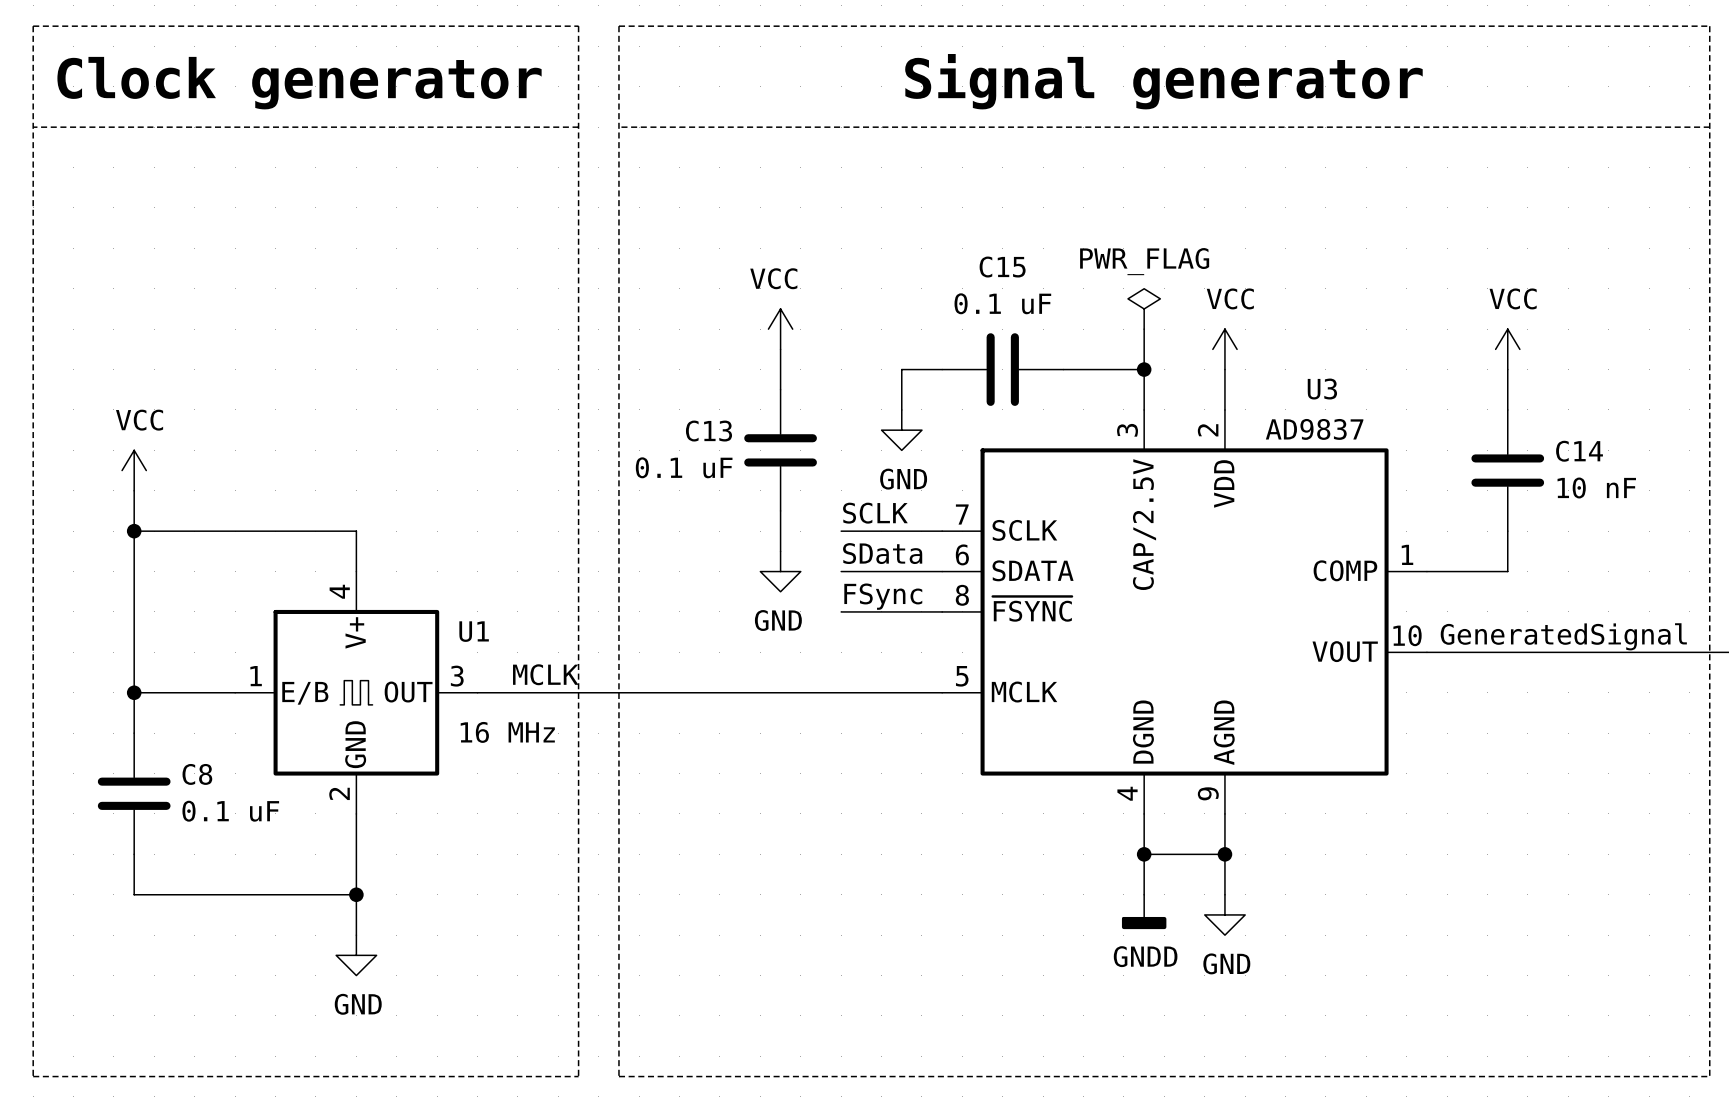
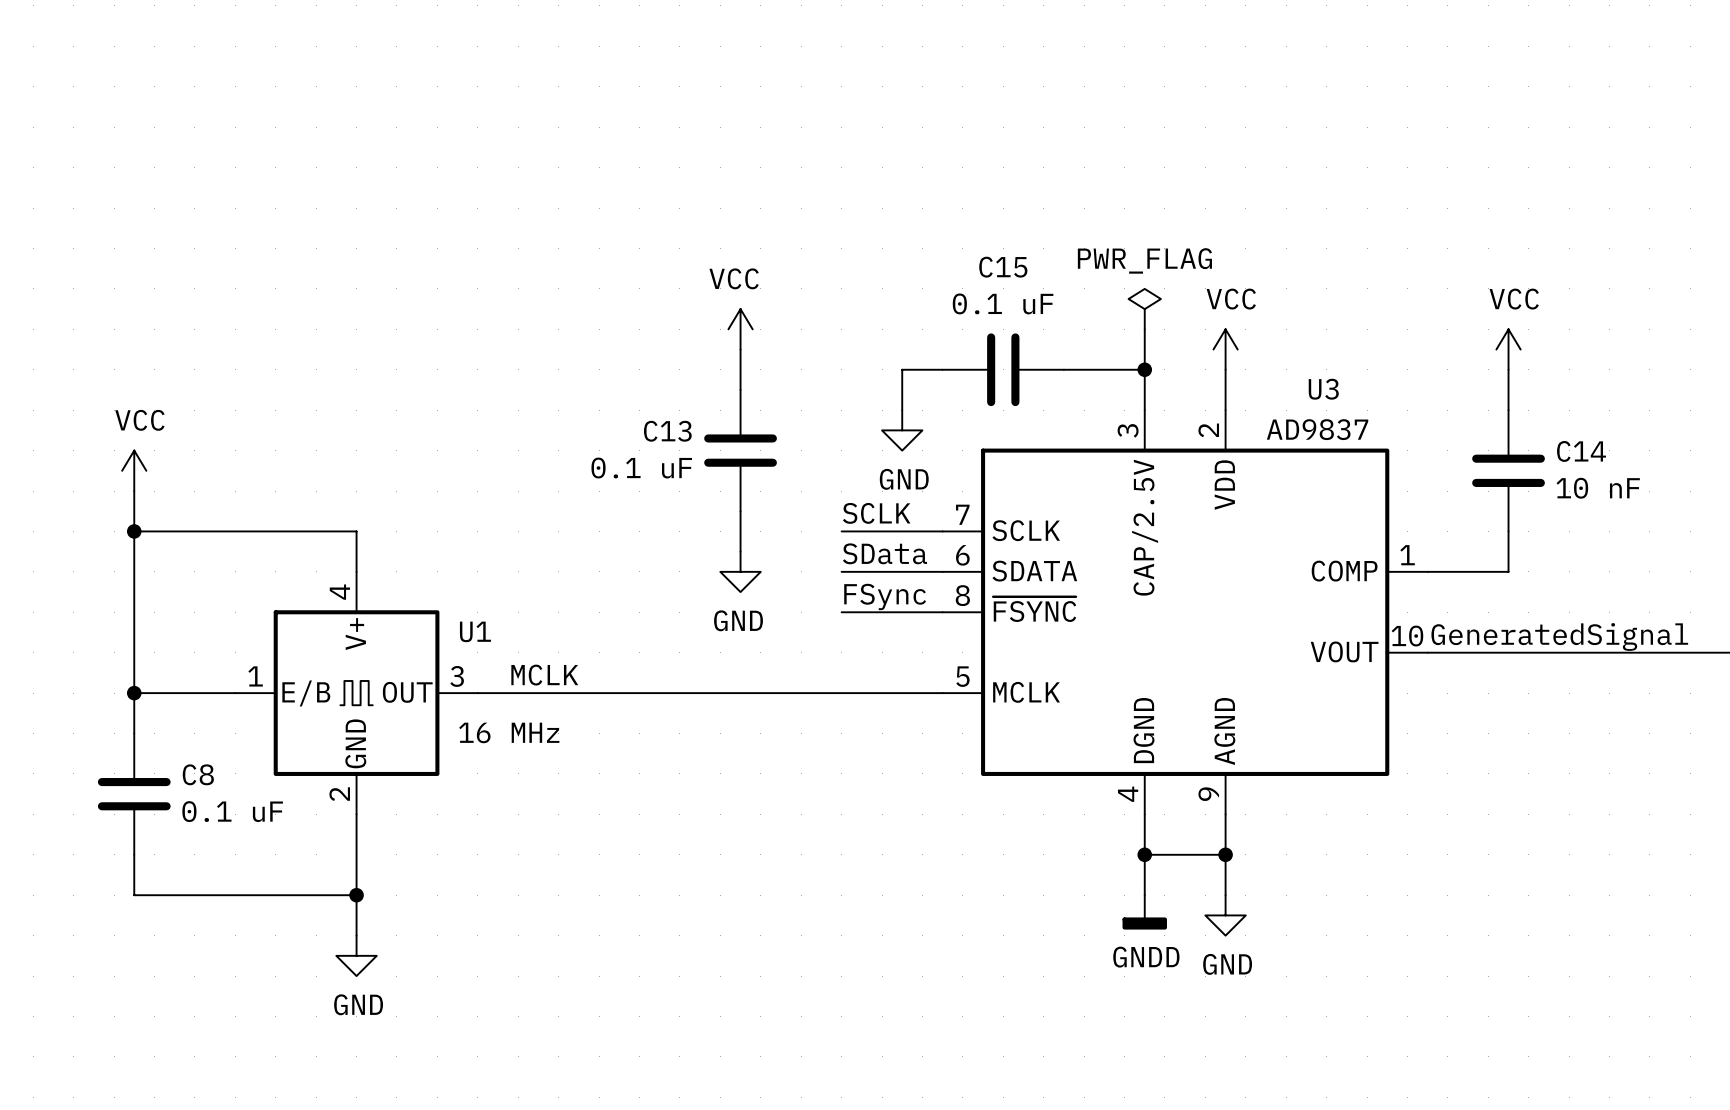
line: (33, 26) (578, 26) (578, 1076) (33, 1076) (33, 26) -> none
line: (618, 26) (1709, 26) (1709, 1076) (618, 1076) (618, 26) -> none
text: Signal generator (1163, 81) -> none
text: Clock generator (299, 83) -> none
line: (33, 127) (578, 127) -> none
line: (618, 127) (1709, 127) -> none
power symbol position: VCC (780, 329) -> VCC (740, 329)
wire: (780, 349) (780, 389) -> (740, 349) (740, 389)
C13 position: (780, 450) -> (740, 450)
wire: (780, 510) (780, 551) -> (740, 511) (740, 551)
power symbol position: GND (780, 571) -> GND (740, 571)

